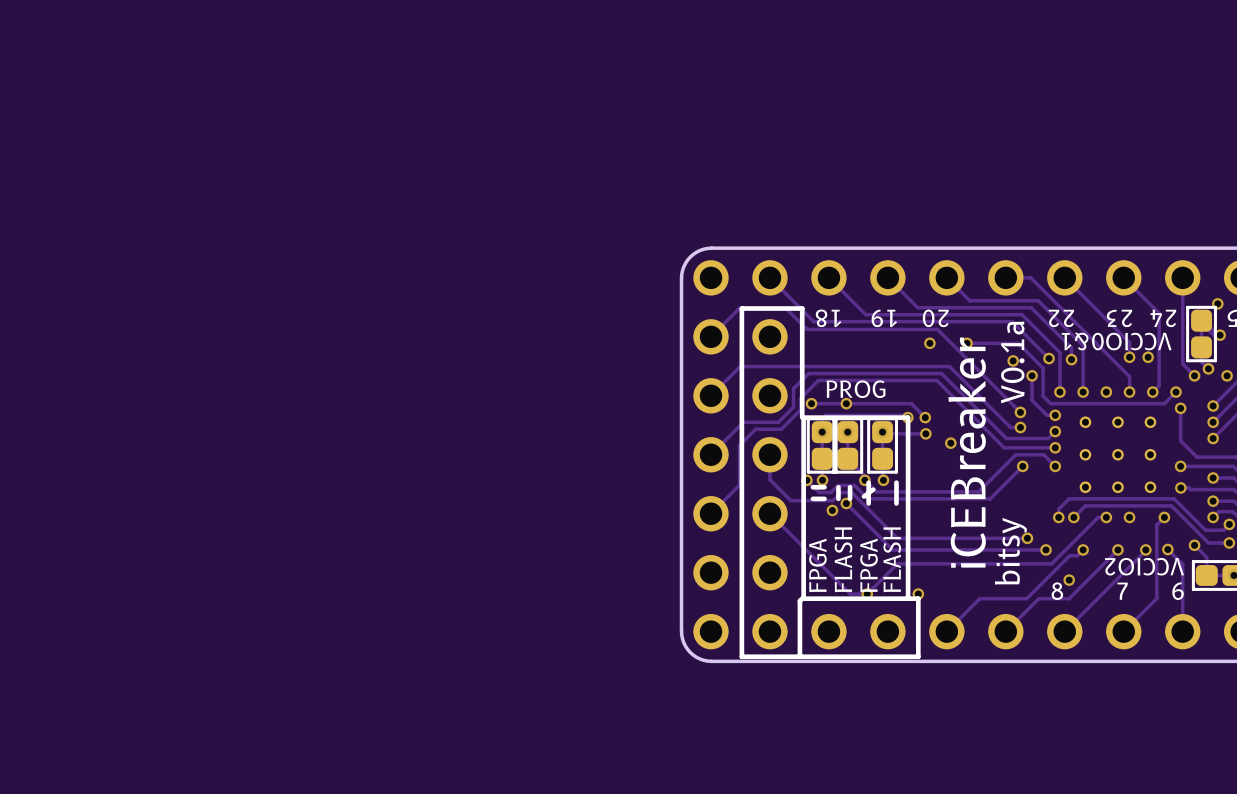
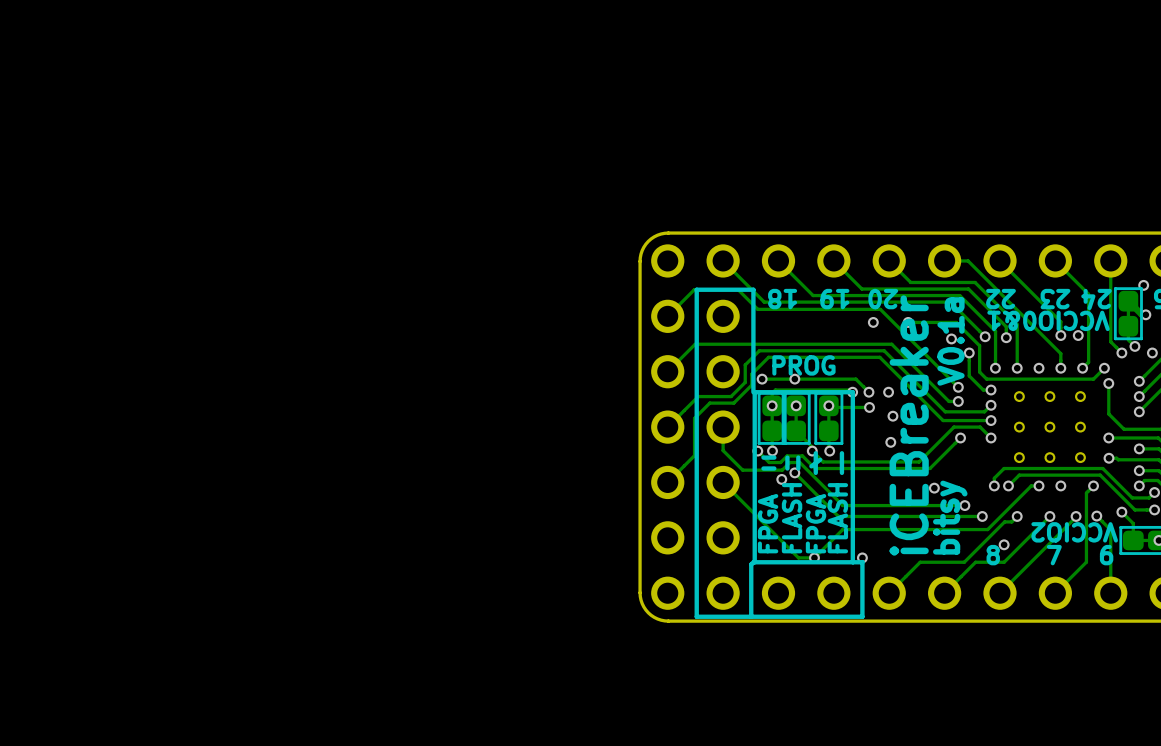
via: none -> (888, 392)
via: none -> (890, 442)
via: none -> (934, 488)

